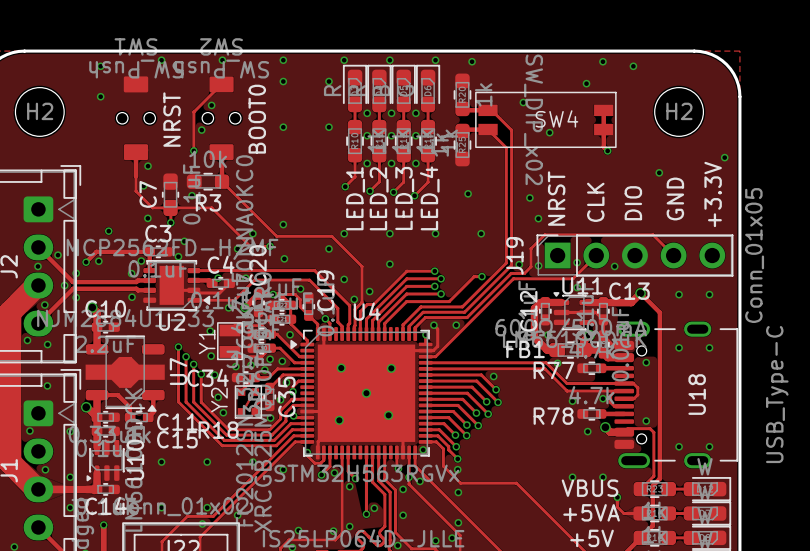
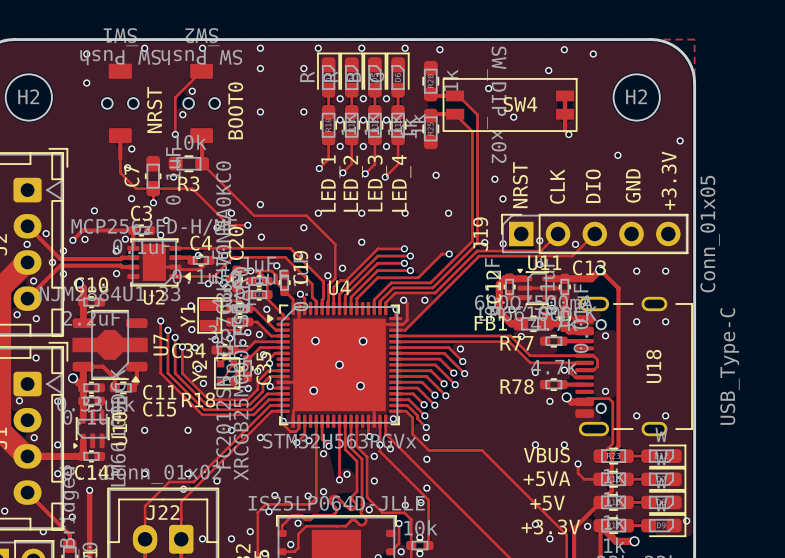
track: (596, 255) (573, 278) -> (594, 233) (572, 256) (535, 256)
track: (673, 255) (652, 234) (544, 234) (531, 248) (531, 266) (524, 273) -> (557, 233) (540, 251) (489, 251)

